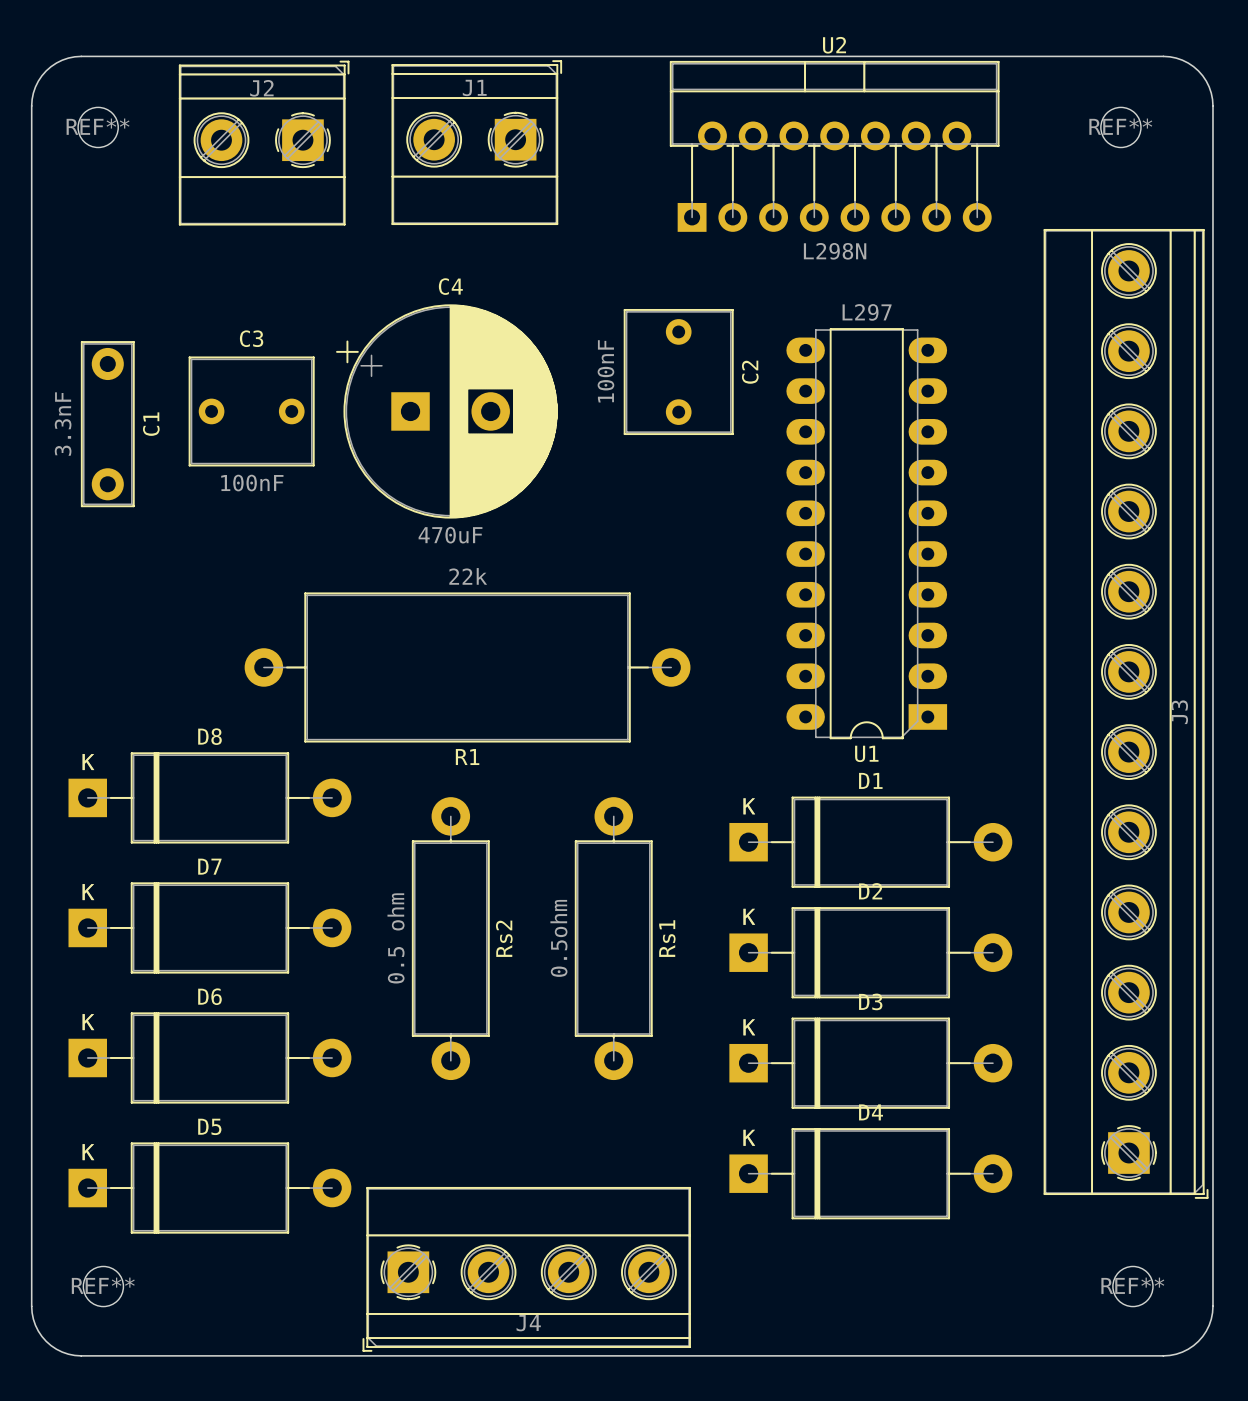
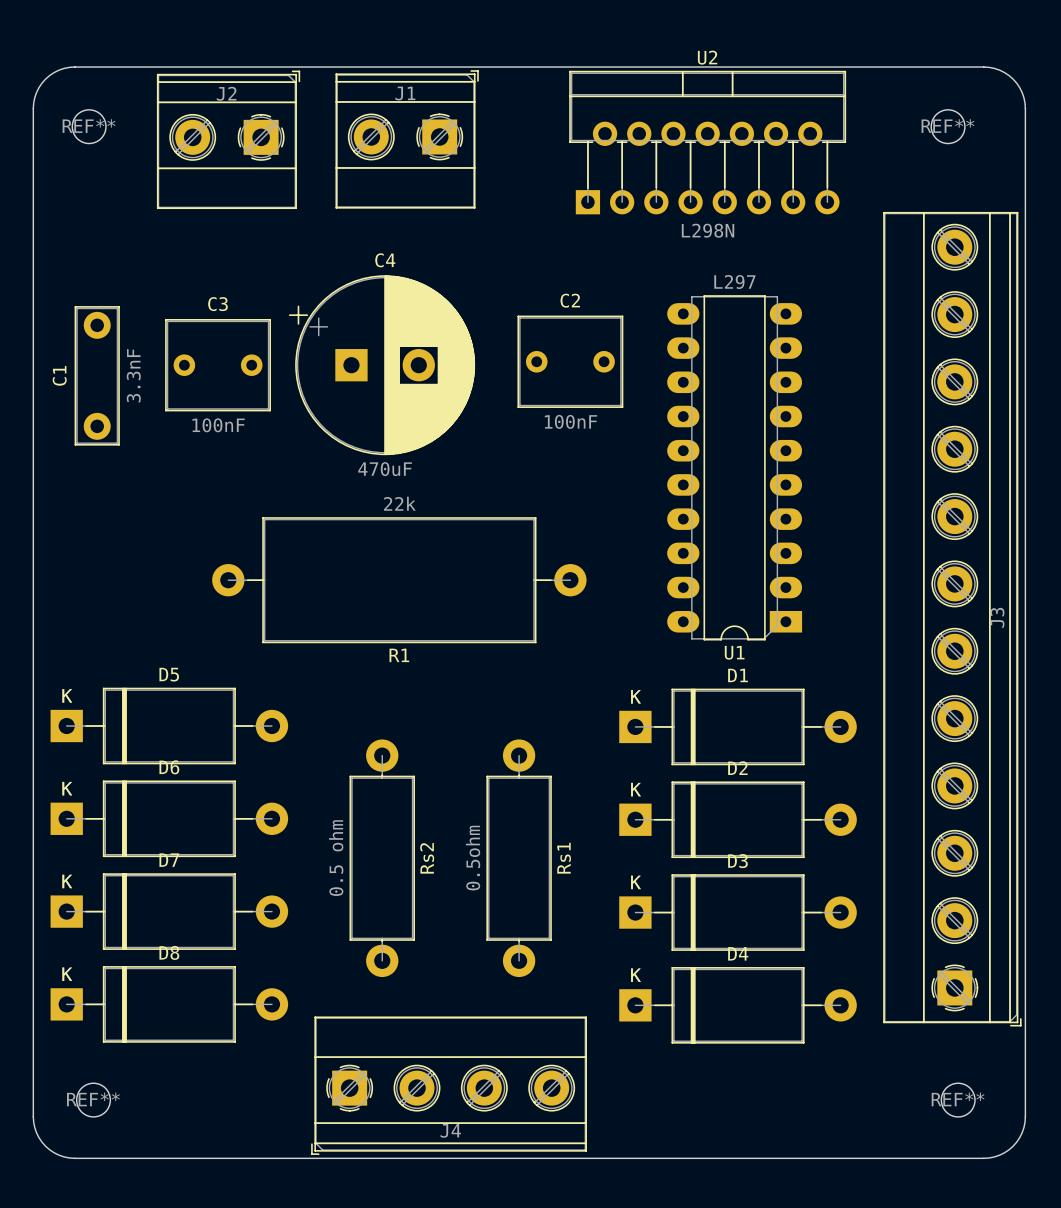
C2 value position: 100nF (605, 371) -> 100nF (570, 421)
C2 rotation: 0° (678, 372) -> 90° clockwise (570, 361)
C2 name position: C2 (750, 372) -> C2 (570, 300)
C1 value position: 3.3nF (63, 424) -> 3.3nF (133, 375)
C1 name position: C1 (151, 424) -> C1 (59, 375)
D8 position: (209, 797) -> (169, 1004)
D7 position: (209, 927) -> (169, 911)
Rs2 position: (450, 938) -> (382, 858)
Rs1 position: (613, 938) -> (519, 858)
D6 position: (209, 1057) -> (169, 818)
D5 position: (209, 1188) -> (169, 726)

